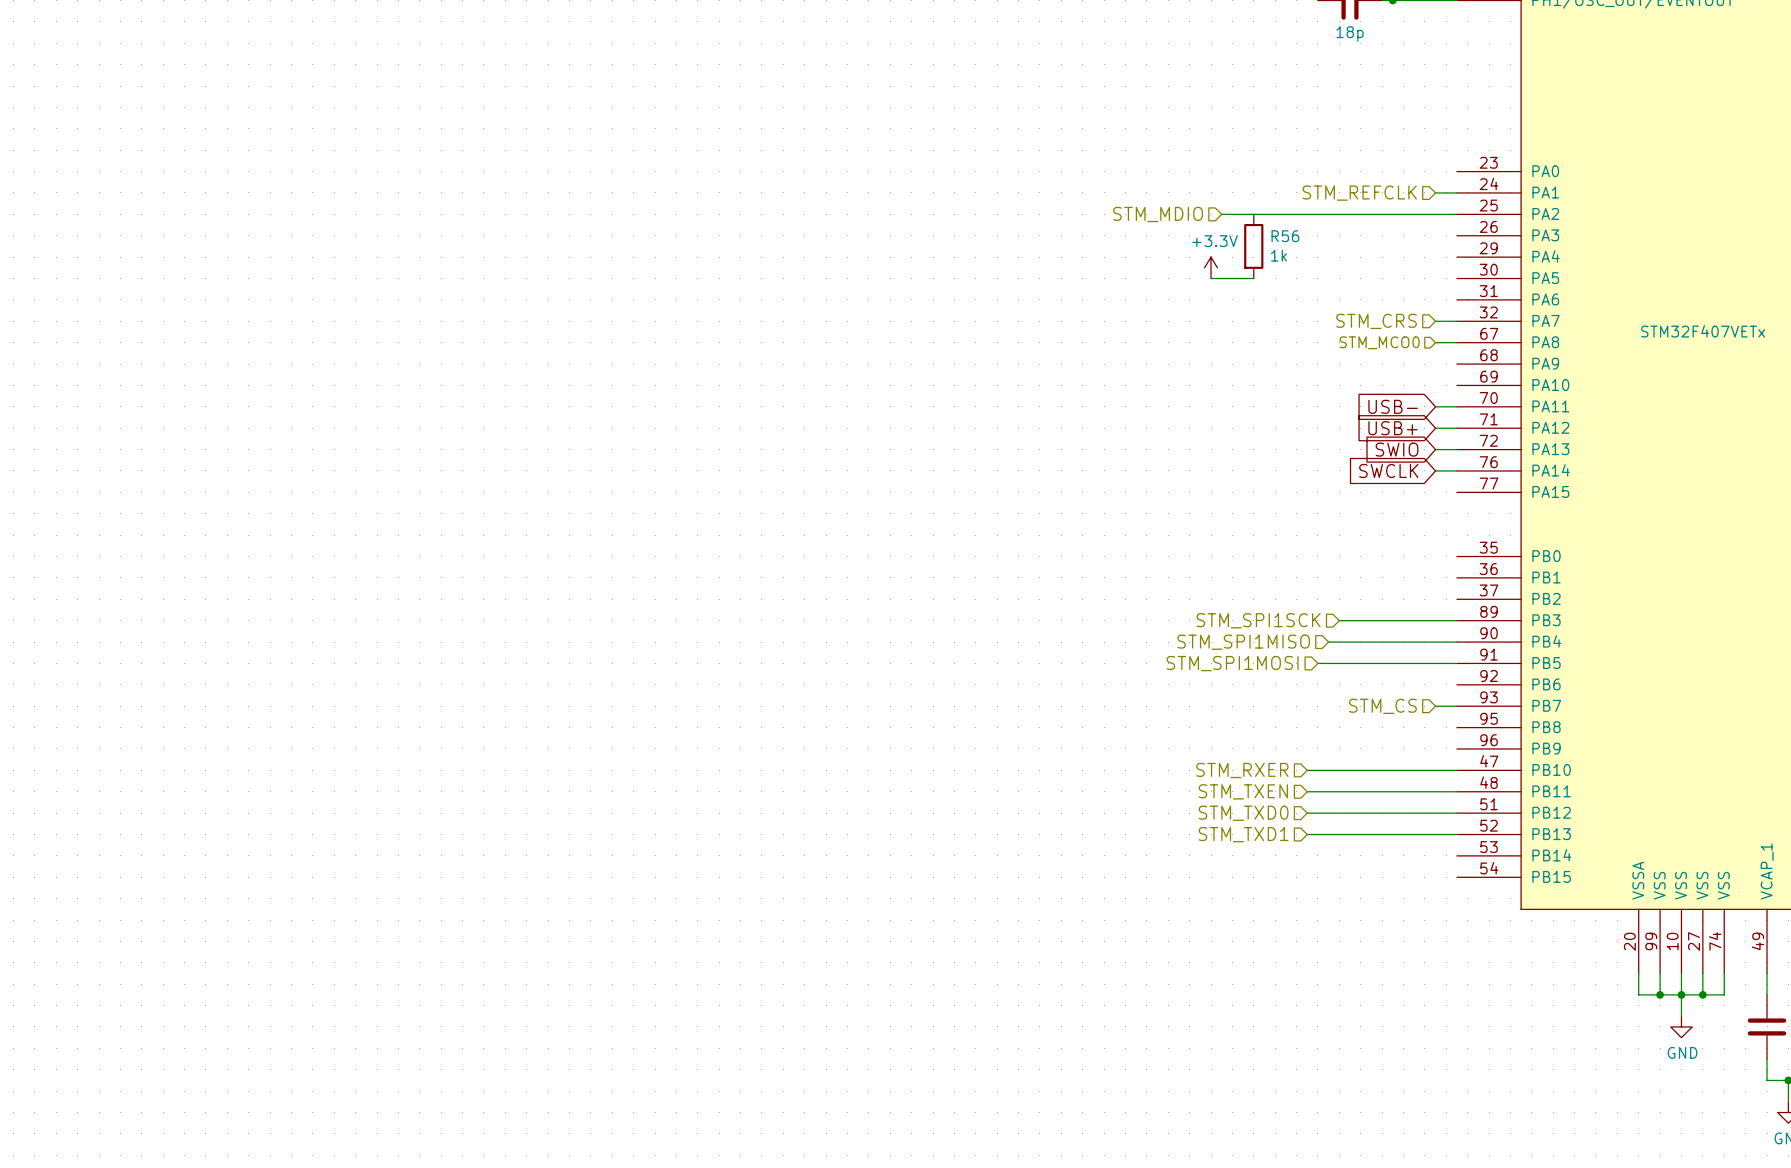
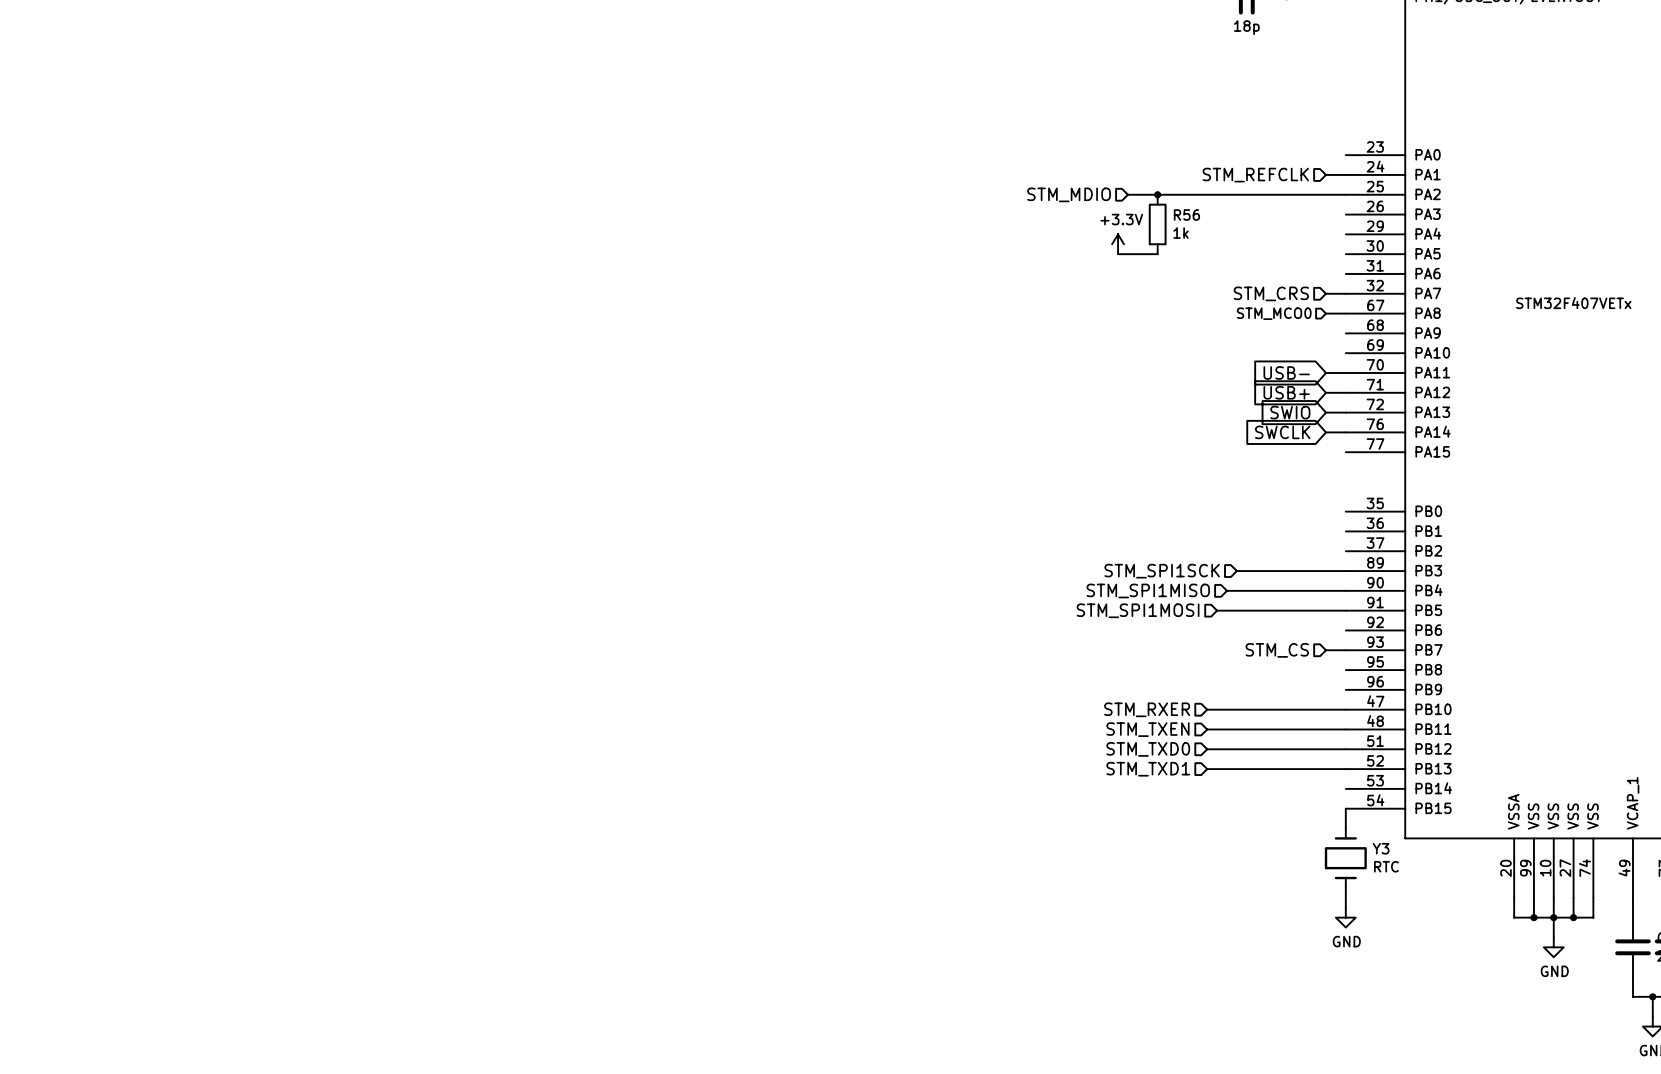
junction: none -> (1157, 194)
wire: none -> (1345, 808) (1345, 828)
Y3: none -> RTC (1345, 858)
wire: none -> (1345, 887) (1345, 907)
power symbol: none -> GND (1345, 917)

